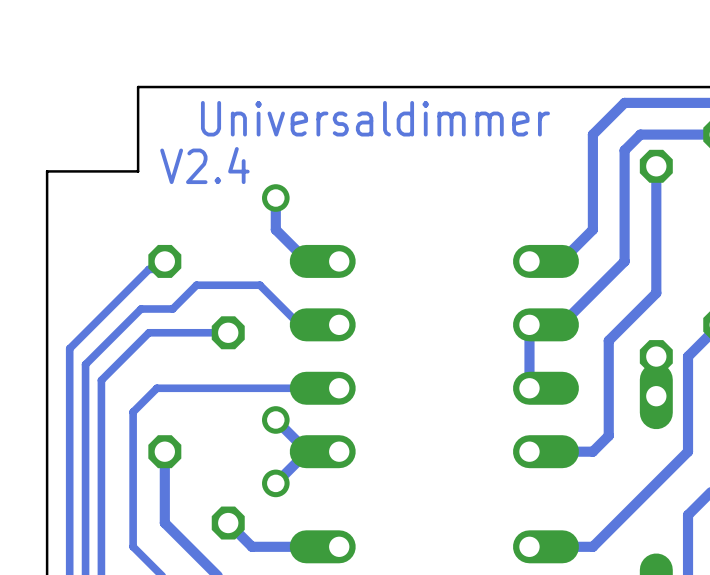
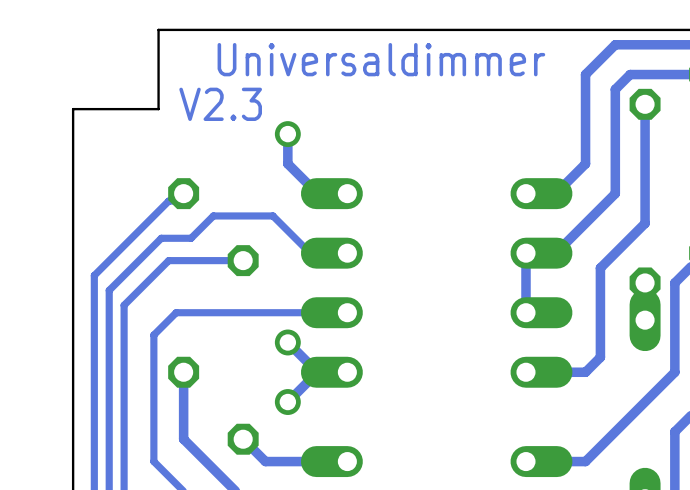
text: V2.4 (204, 165) -> V2.3 (220, 104)

